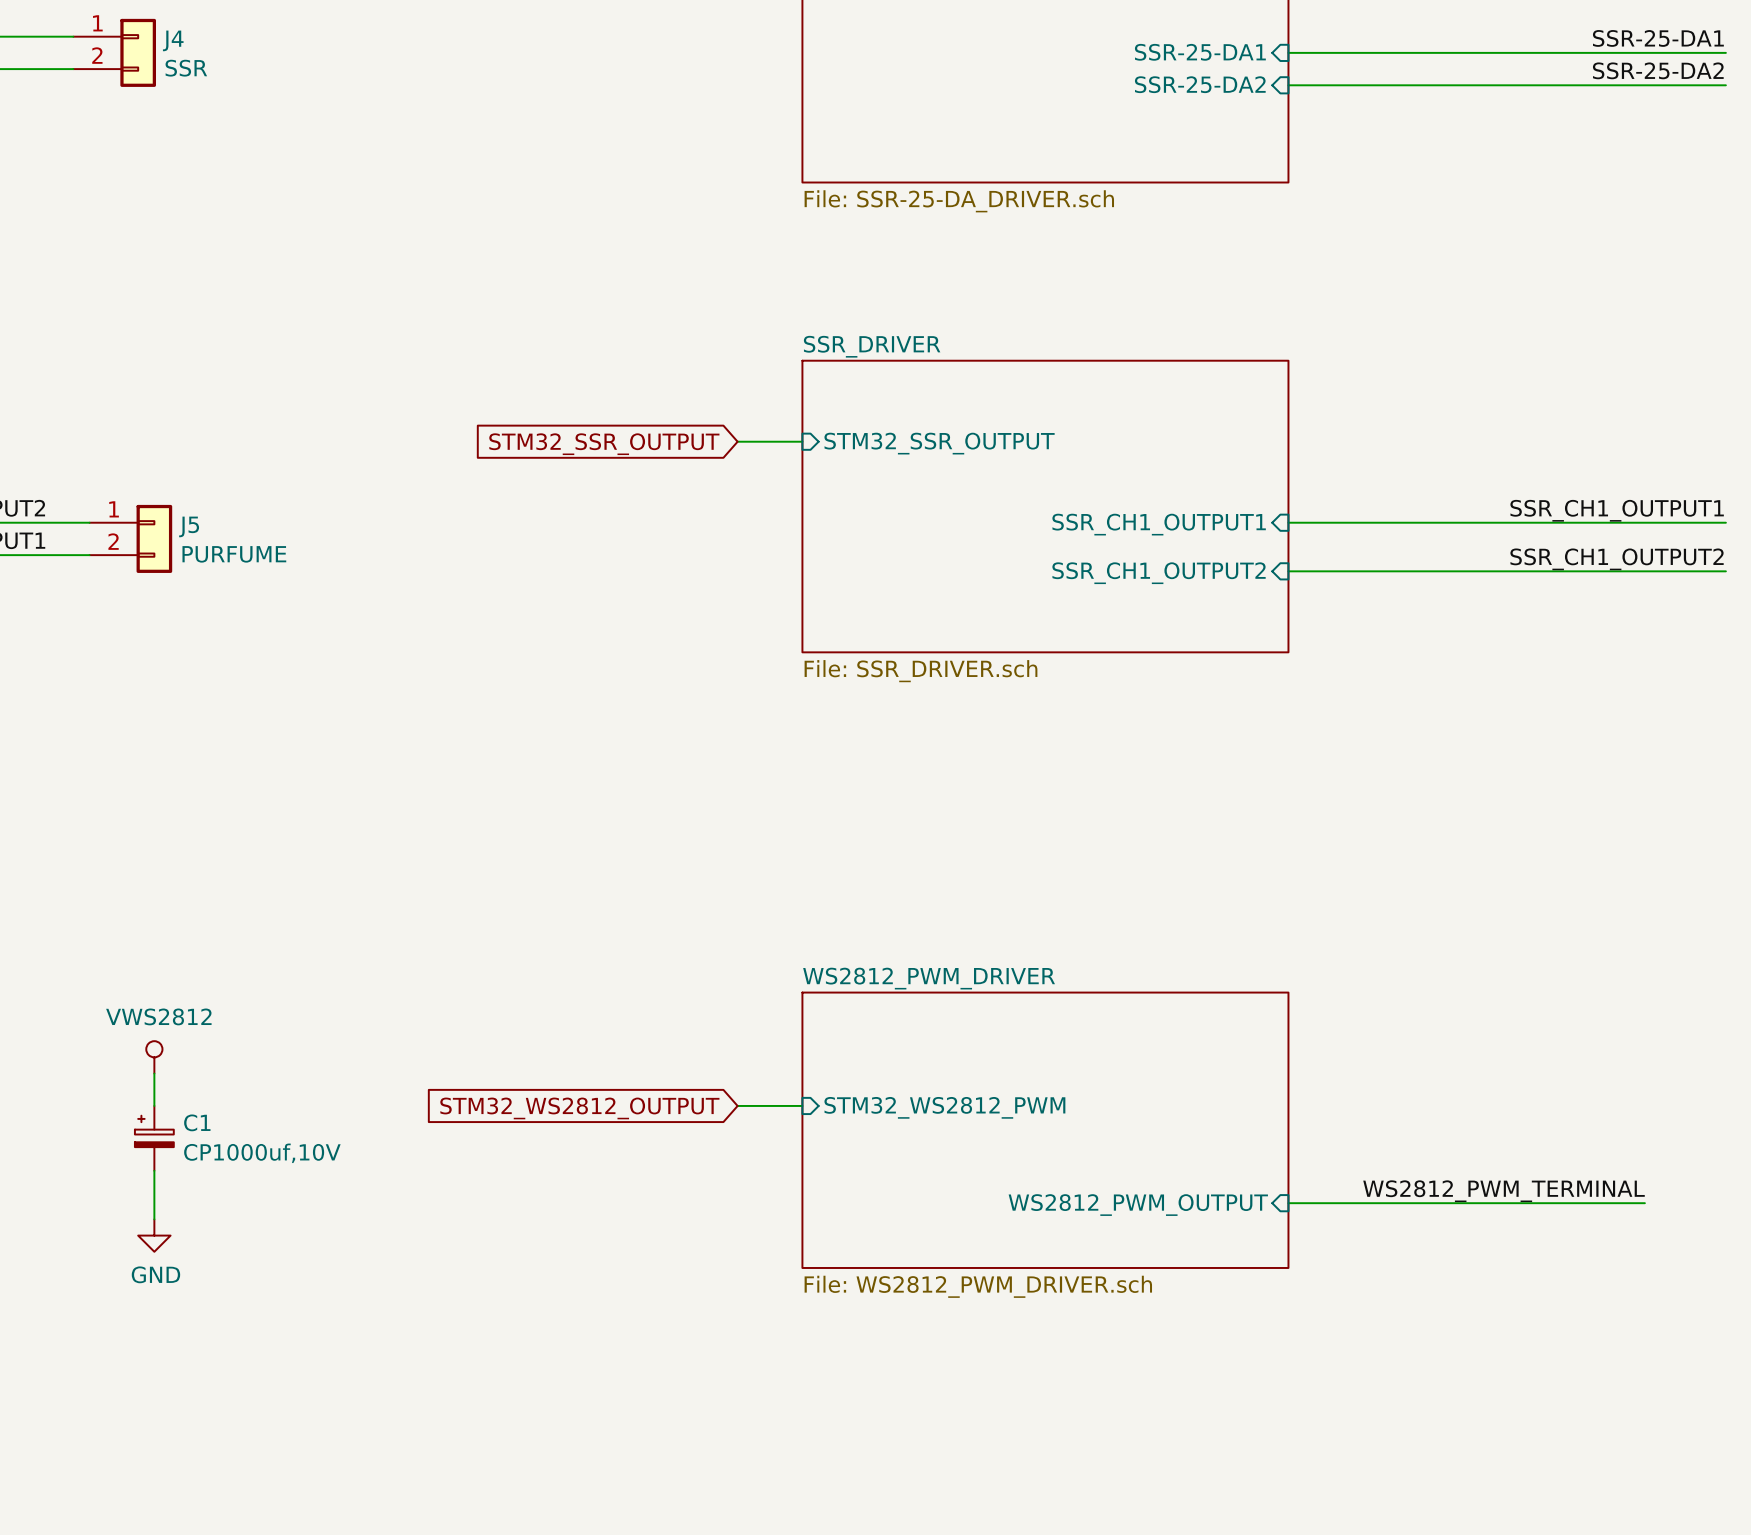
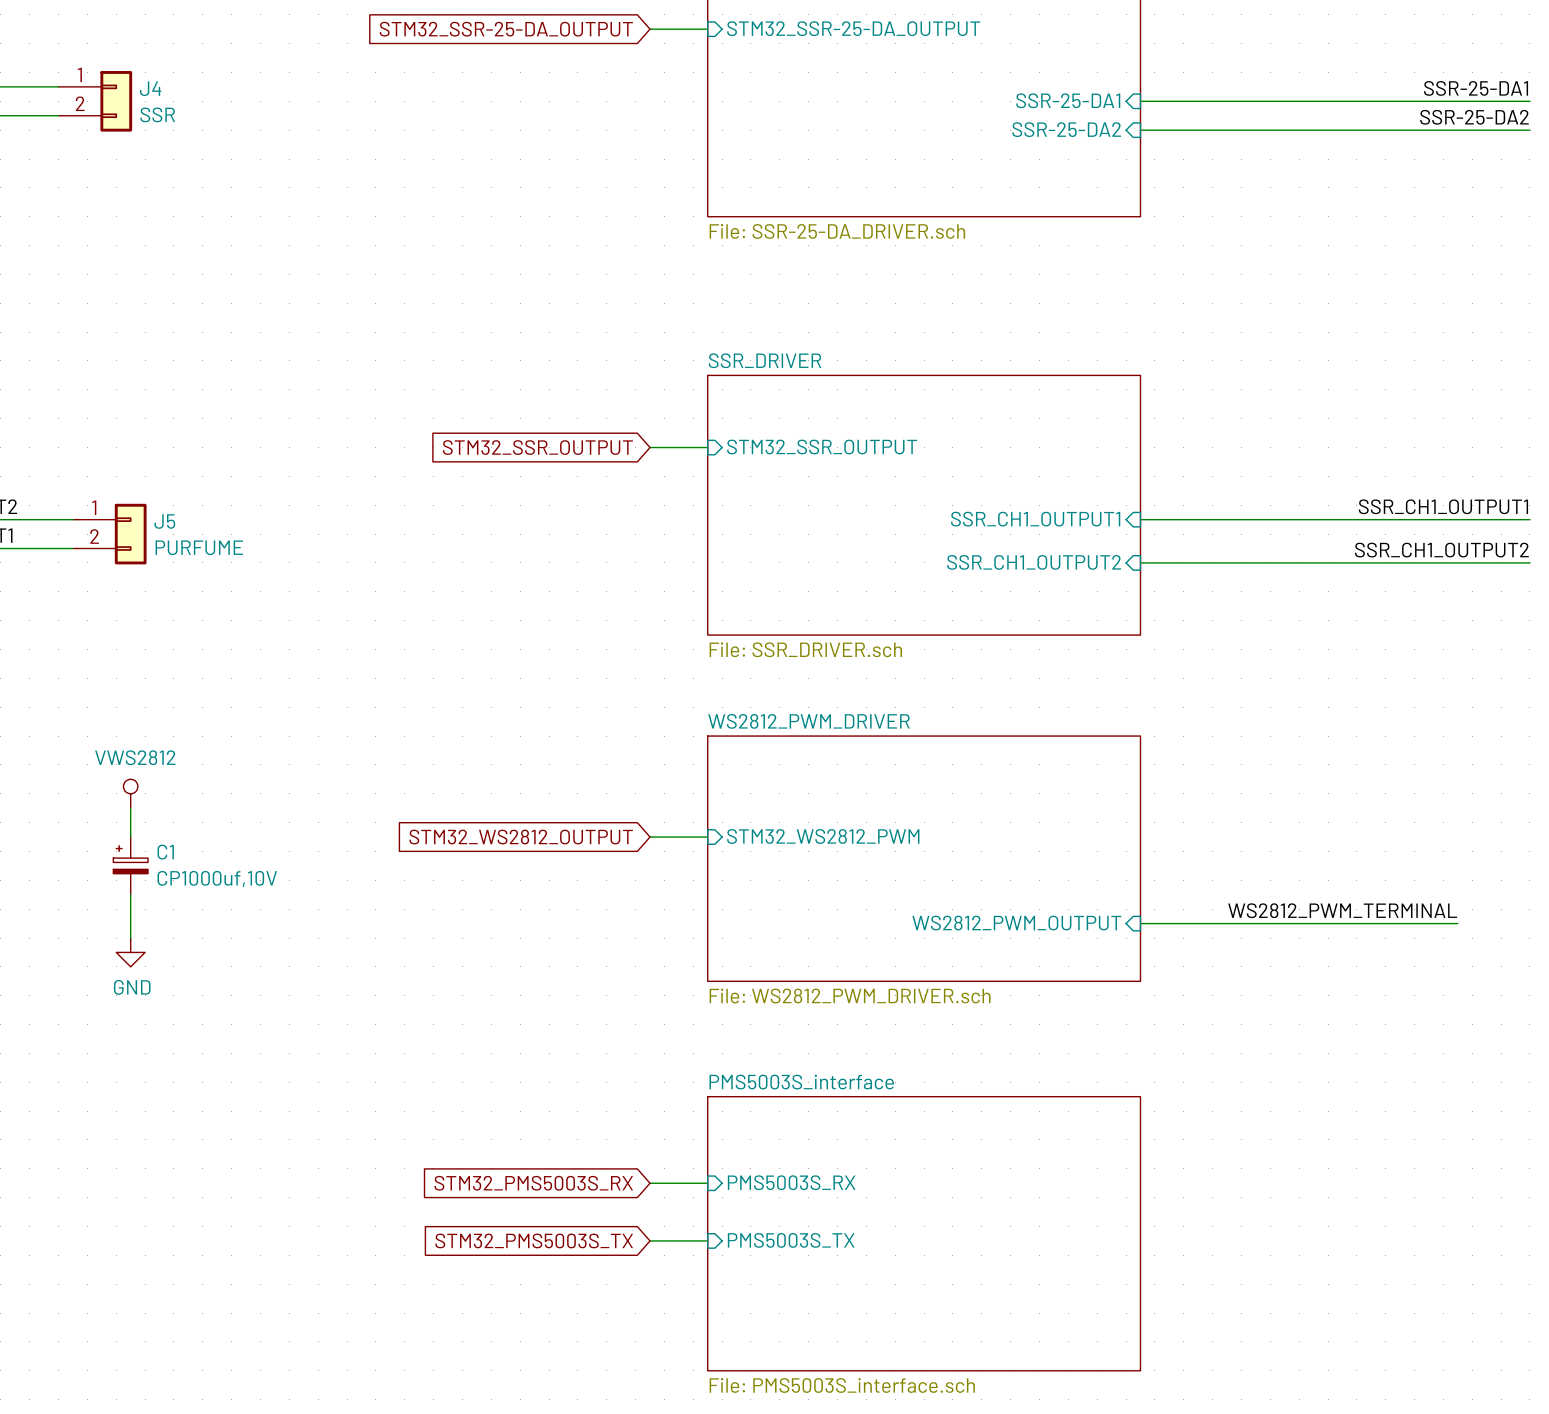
power symbol position: VWS2812 (154, 1057) -> VWS2812 (130, 793)
wire: (154, 1073) (154, 1105) -> (130, 808) (130, 837)
wire: (737, 1105) (802, 1105) -> (650, 837) (707, 837)
sheet pin position: STM32_WS2812_PWM (944, 1107) -> STM32_WS2812_PWM (823, 836)
global label position: STM32_WS2812_OUTPUT (579, 1108) -> STM32_WS2812_OUTPUT (521, 837)
sheet WS2812_PWM_DRIVER position: (1045, 1130) -> (924, 858)
C1 position: (154, 1138) -> (130, 865)
wire: (154, 1170) (154, 1219) -> (130, 894) (130, 938)
label position: WS2812_PWM_TERMINAL (1504, 1191) -> WS2812_PWM_TERMINAL (1342, 910)
wire: (1288, 1203) (1644, 1203) -> (1140, 923) (1457, 923)
sheet pin position: WS2812_PWM_OUTPUT (1138, 1205) -> WS2812_PWM_OUTPUT (1016, 923)
power symbol position: GND (154, 1235) -> GND (130, 952)
wire: none -> (650, 1183) (707, 1183)
sheet pin: none -> PMS5003S_RX (791, 1182)
global label: none -> STM32_PMS5003S_RX (533, 1183)
sheet PMS5003S_interface: none -> File: PMS5003S_interface.sch (924, 1233)
wire: none -> (650, 1240) (707, 1240)
sheet pin: none -> PMS5003S_TX (791, 1240)
global label: none -> STM32_PMS5003S_TX (534, 1240)

